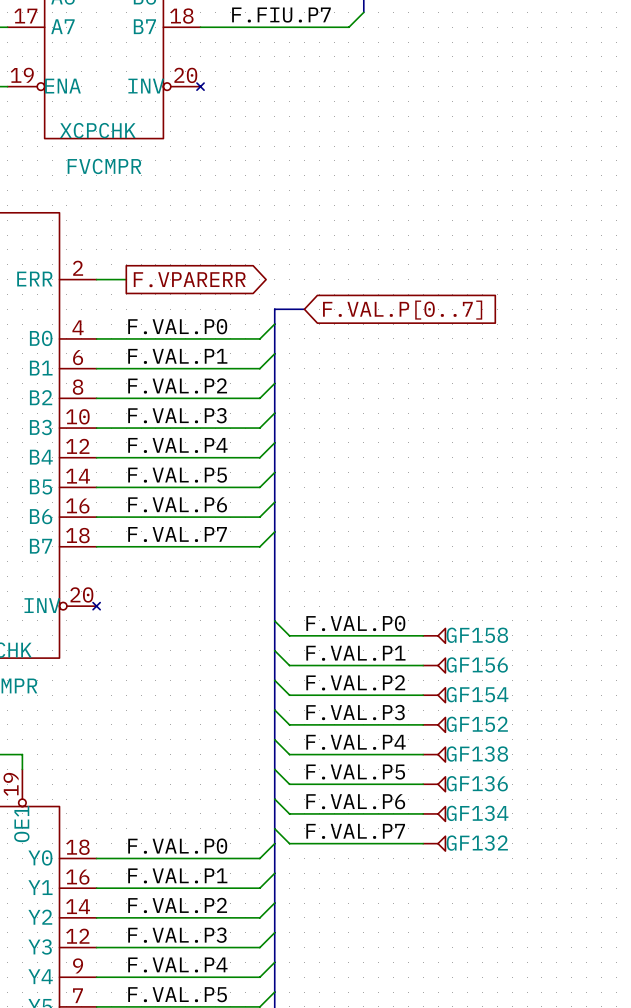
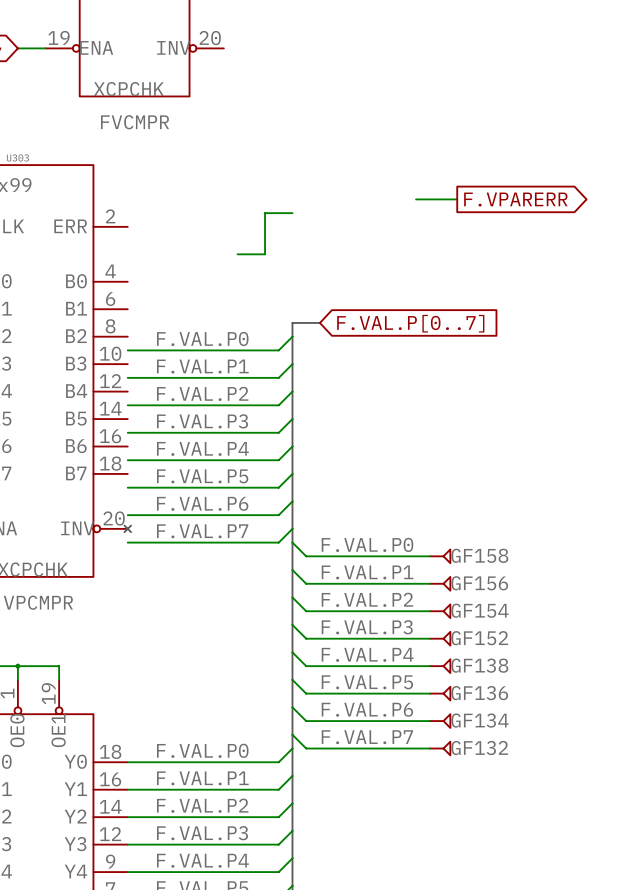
no-connect mark: (200, 86) -> none
wire: none -> (416, 199) (457, 199)
global label: none -> F.VPARERR (515, 199)
wire: none -> (292, 213) (265, 213) (265, 254) (237, 254)
wire: (96, 279) (126, 279) -> none
global label: F.VPARERR (189, 279) -> none
bus: (304, 309) (274, 309) (274, 383) -> (319, 322) (292, 322)
global label position: F.VAL.P[0..7] (402, 310) -> F.VAL.P[0..7] (410, 323)
wire: (274, 324) (259, 338) (96, 338) -> (292, 336) (278, 350) (127, 350)
label position: F.VAL.P0 (177, 326) -> F.VAL.P0 (202, 338)
wire: (274, 353) (259, 368) (96, 368) -> (292, 364) (278, 377) (127, 377)
label position: F.VAL.P1 (177, 356) -> F.VAL.P1 (202, 366)
wire: (274, 383) (259, 398) (96, 398) -> (292, 391) (278, 405) (127, 405)
label position: F.VAL.P2 (177, 385) -> F.VAL.P2 (202, 393)
wire: (274, 413) (259, 428) (96, 428) -> (292, 419) (278, 432) (127, 432)
label position: F.VAL.P3 (177, 415) -> F.VAL.P3 (202, 421)
wire: (274, 442) (259, 457) (96, 457) -> (292, 446) (278, 460) (127, 460)
label position: F.VAL.P4 (177, 445) -> F.VAL.P4 (202, 448)
wire: (274, 472) (259, 487) (96, 487) -> (292, 473) (278, 487) (127, 487)
label position: F.VAL.P5 (177, 475) -> F.VAL.P5 (202, 476)
wire: (274, 502) (259, 517) (96, 517) -> (292, 501) (278, 515) (127, 515)
label position: F.VAL.P6 (177, 504) -> F.VAL.P6 (202, 503)
wire: (274, 531) (259, 546) (96, 546) -> (292, 528) (278, 542) (127, 542)
label position: F.VAL.P7 (177, 534) -> F.VAL.P7 (202, 531)

